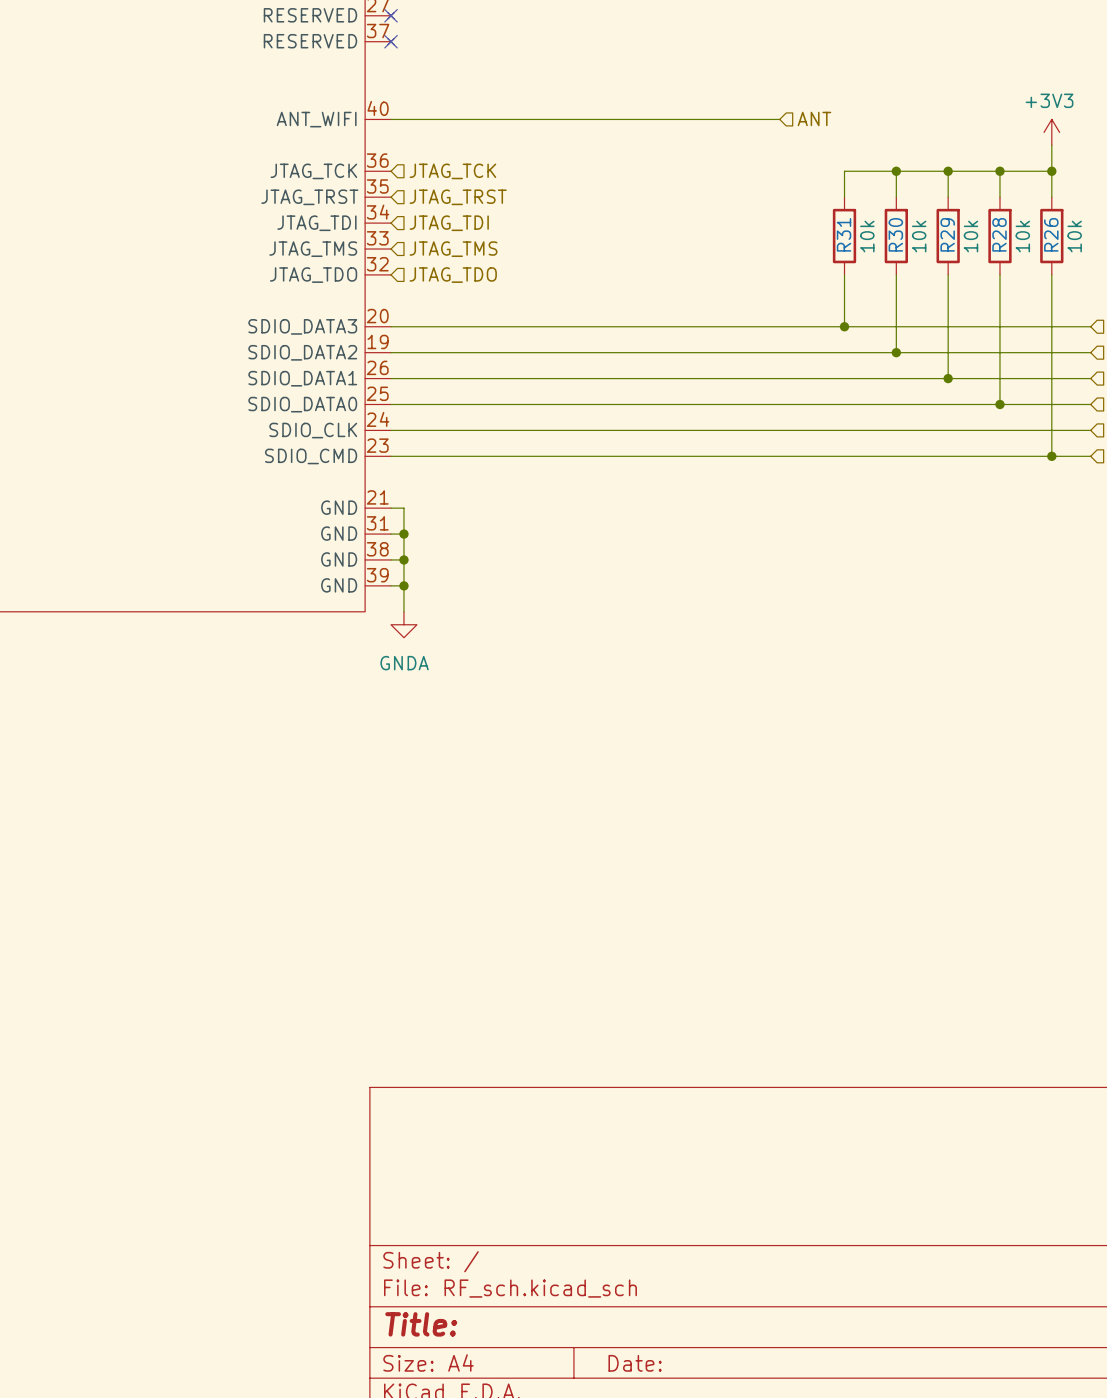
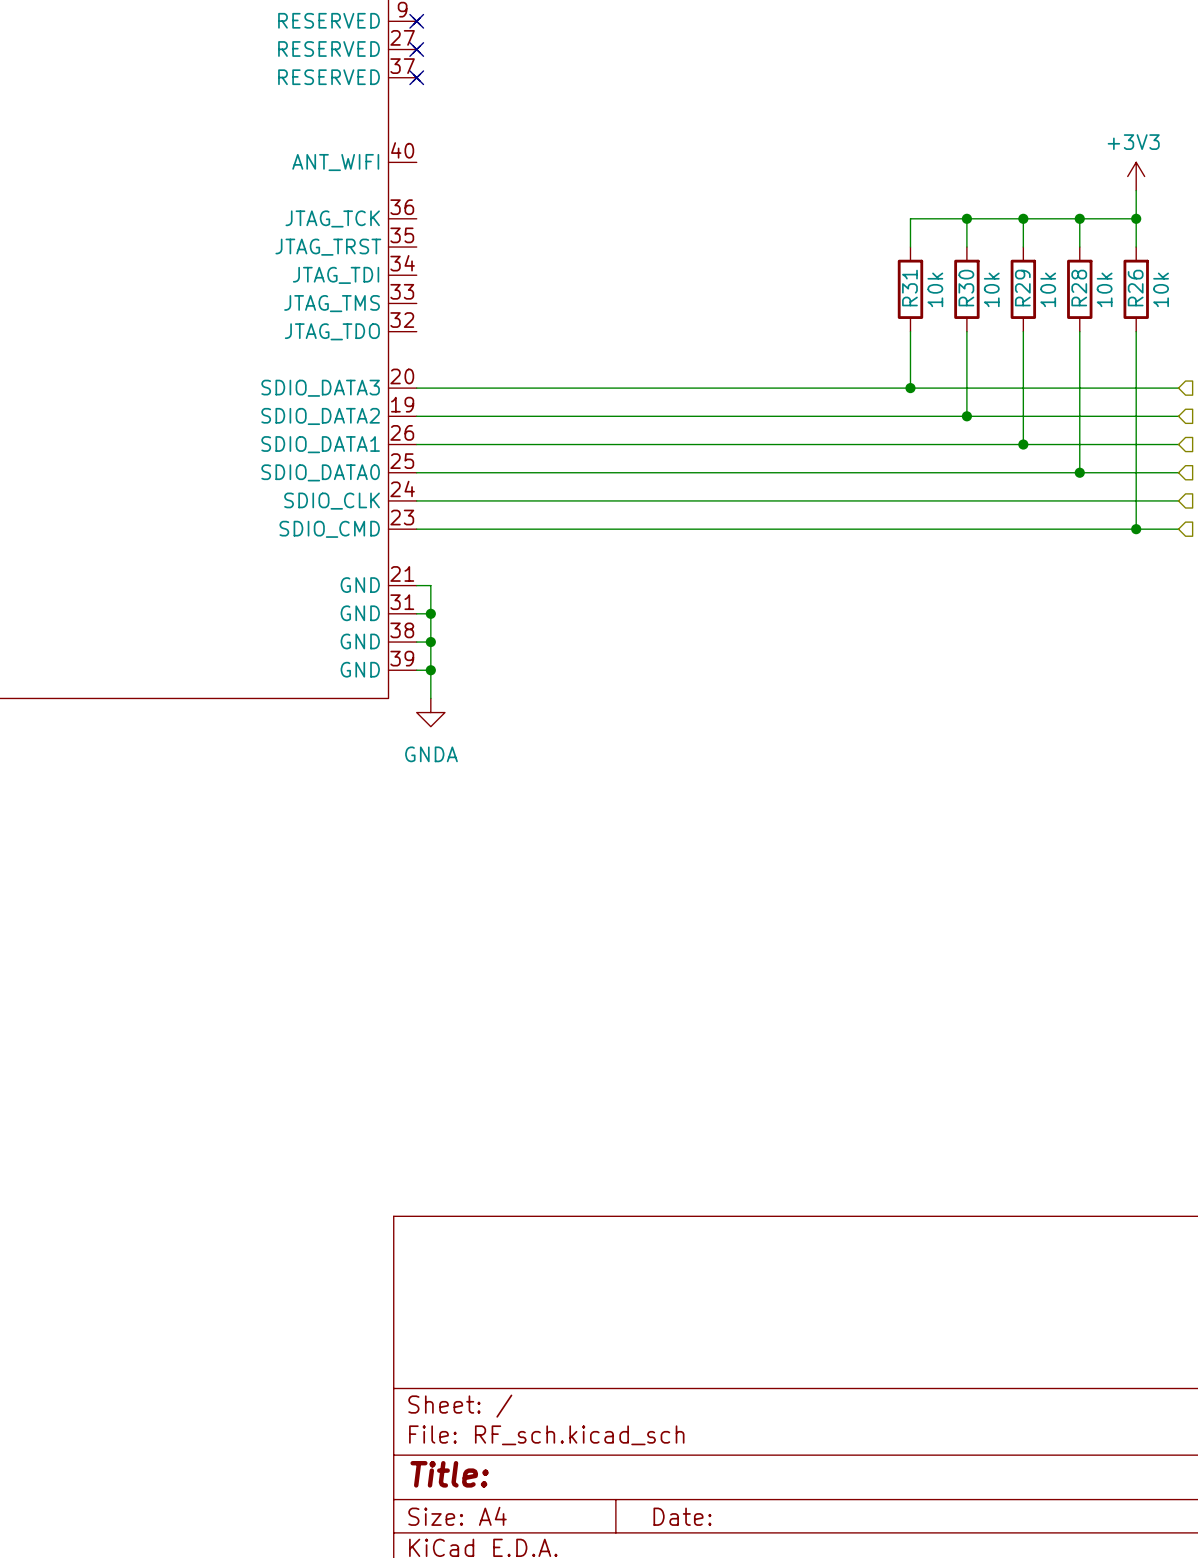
hierarchical label: ANT (814, 118) -> none
wire: (391, 119) (779, 119) -> none
hierarchical label: JTAG_TCK (452, 171) -> none
hierarchical label: JTAG_TRST (458, 197) -> none
hierarchical label: JTAG_TDI (449, 223) -> none
hierarchical label: JTAG_TMS (453, 249) -> none
hierarchical label: JTAG_TDO (453, 275) -> none

